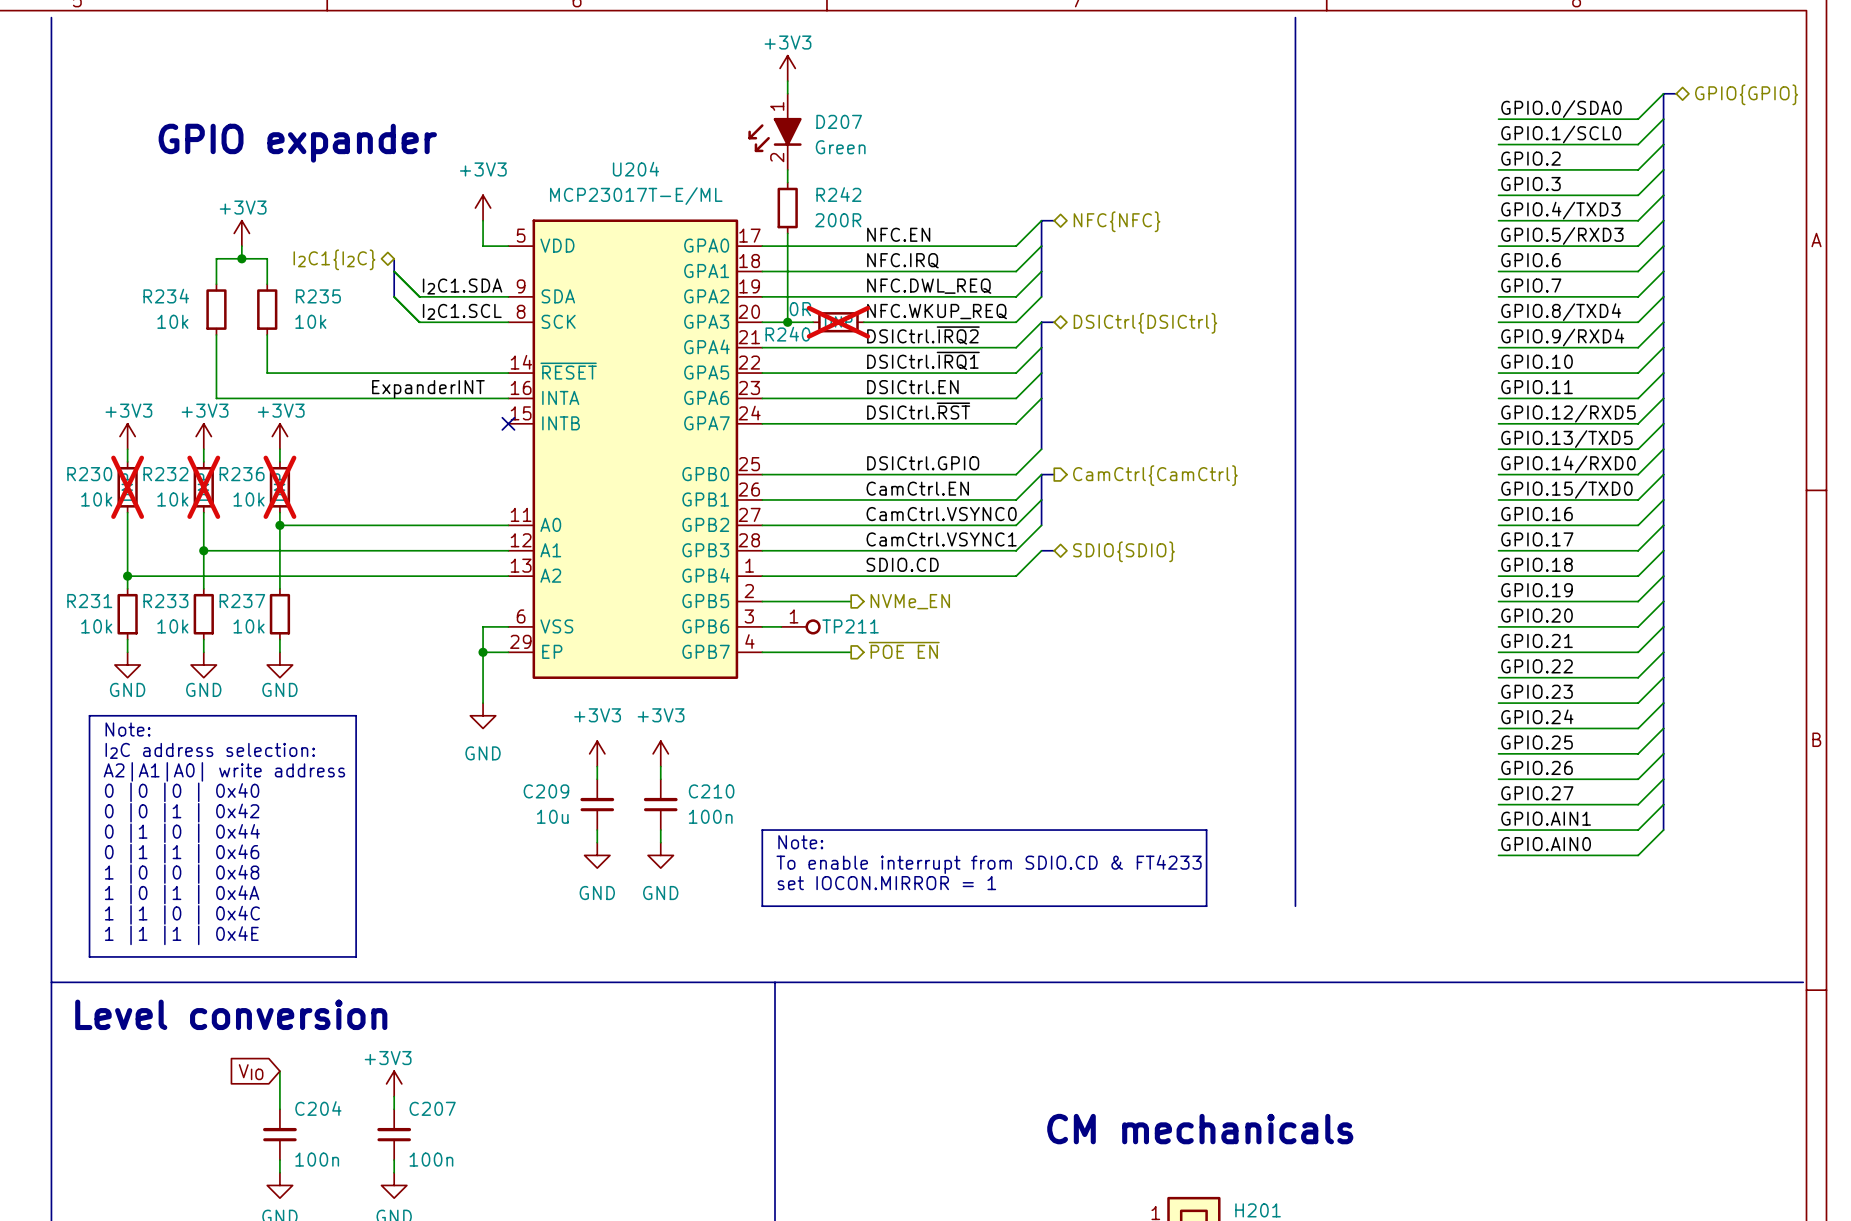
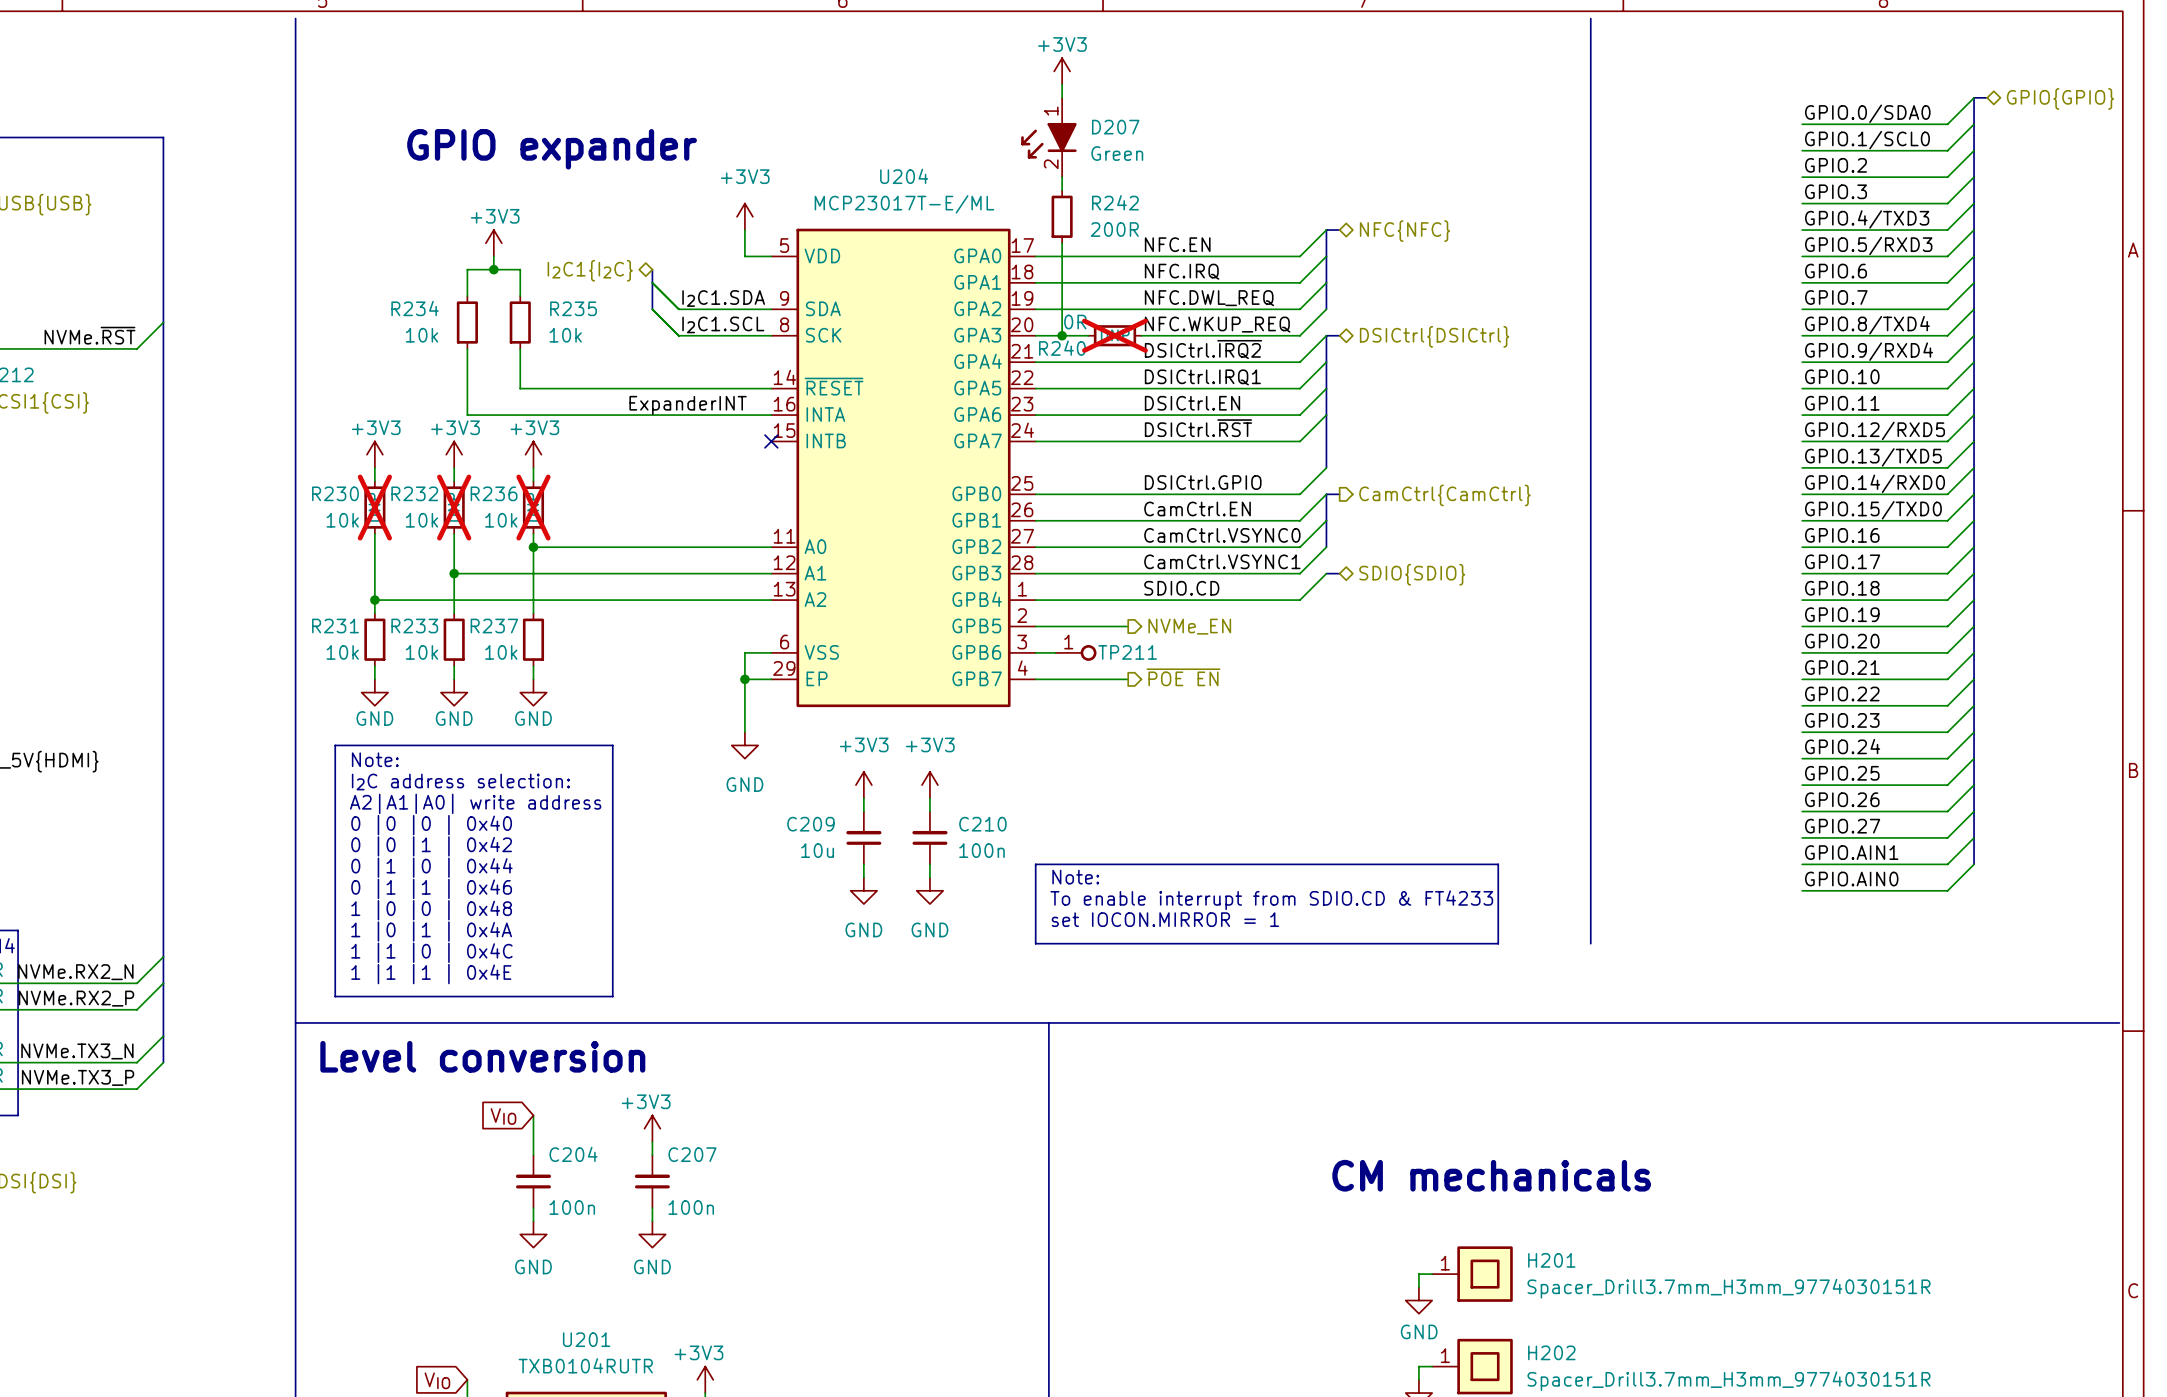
label: DSICtrl.~{IRQ1} (923, 360) -> DSICtrl.IRQ1 (1202, 377)

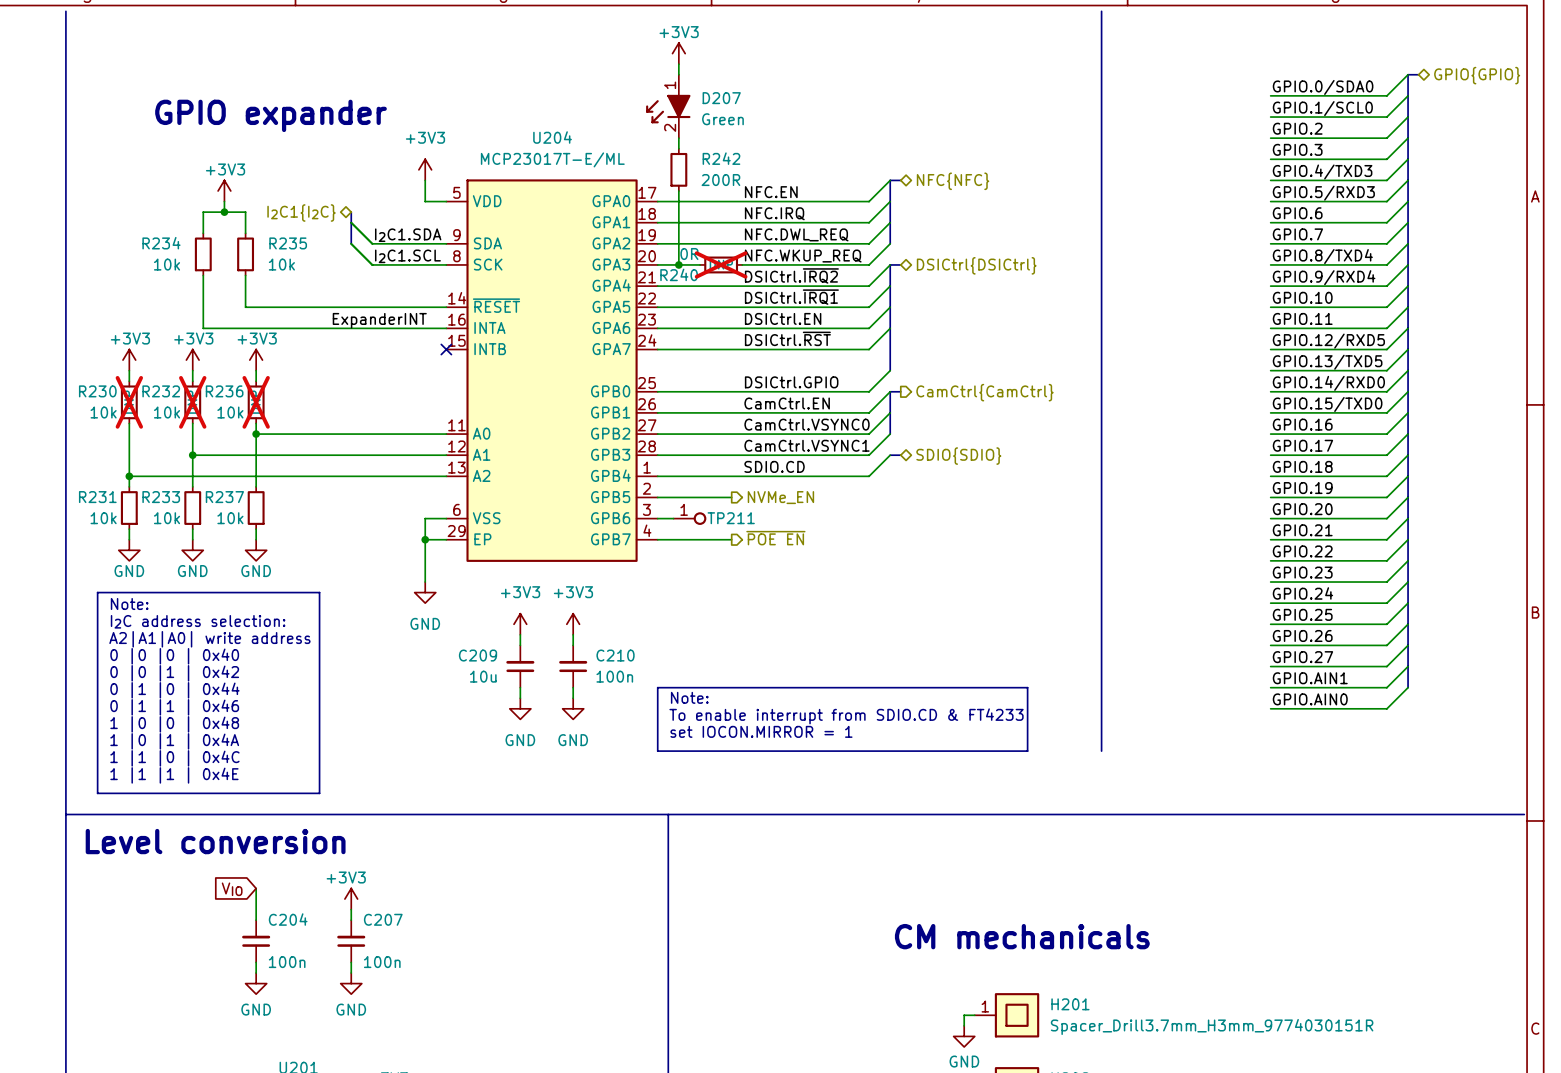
label: DSICtrl.IRQ1 (1202, 377) -> DSICtrl.~{IRQ1} (791, 297)

